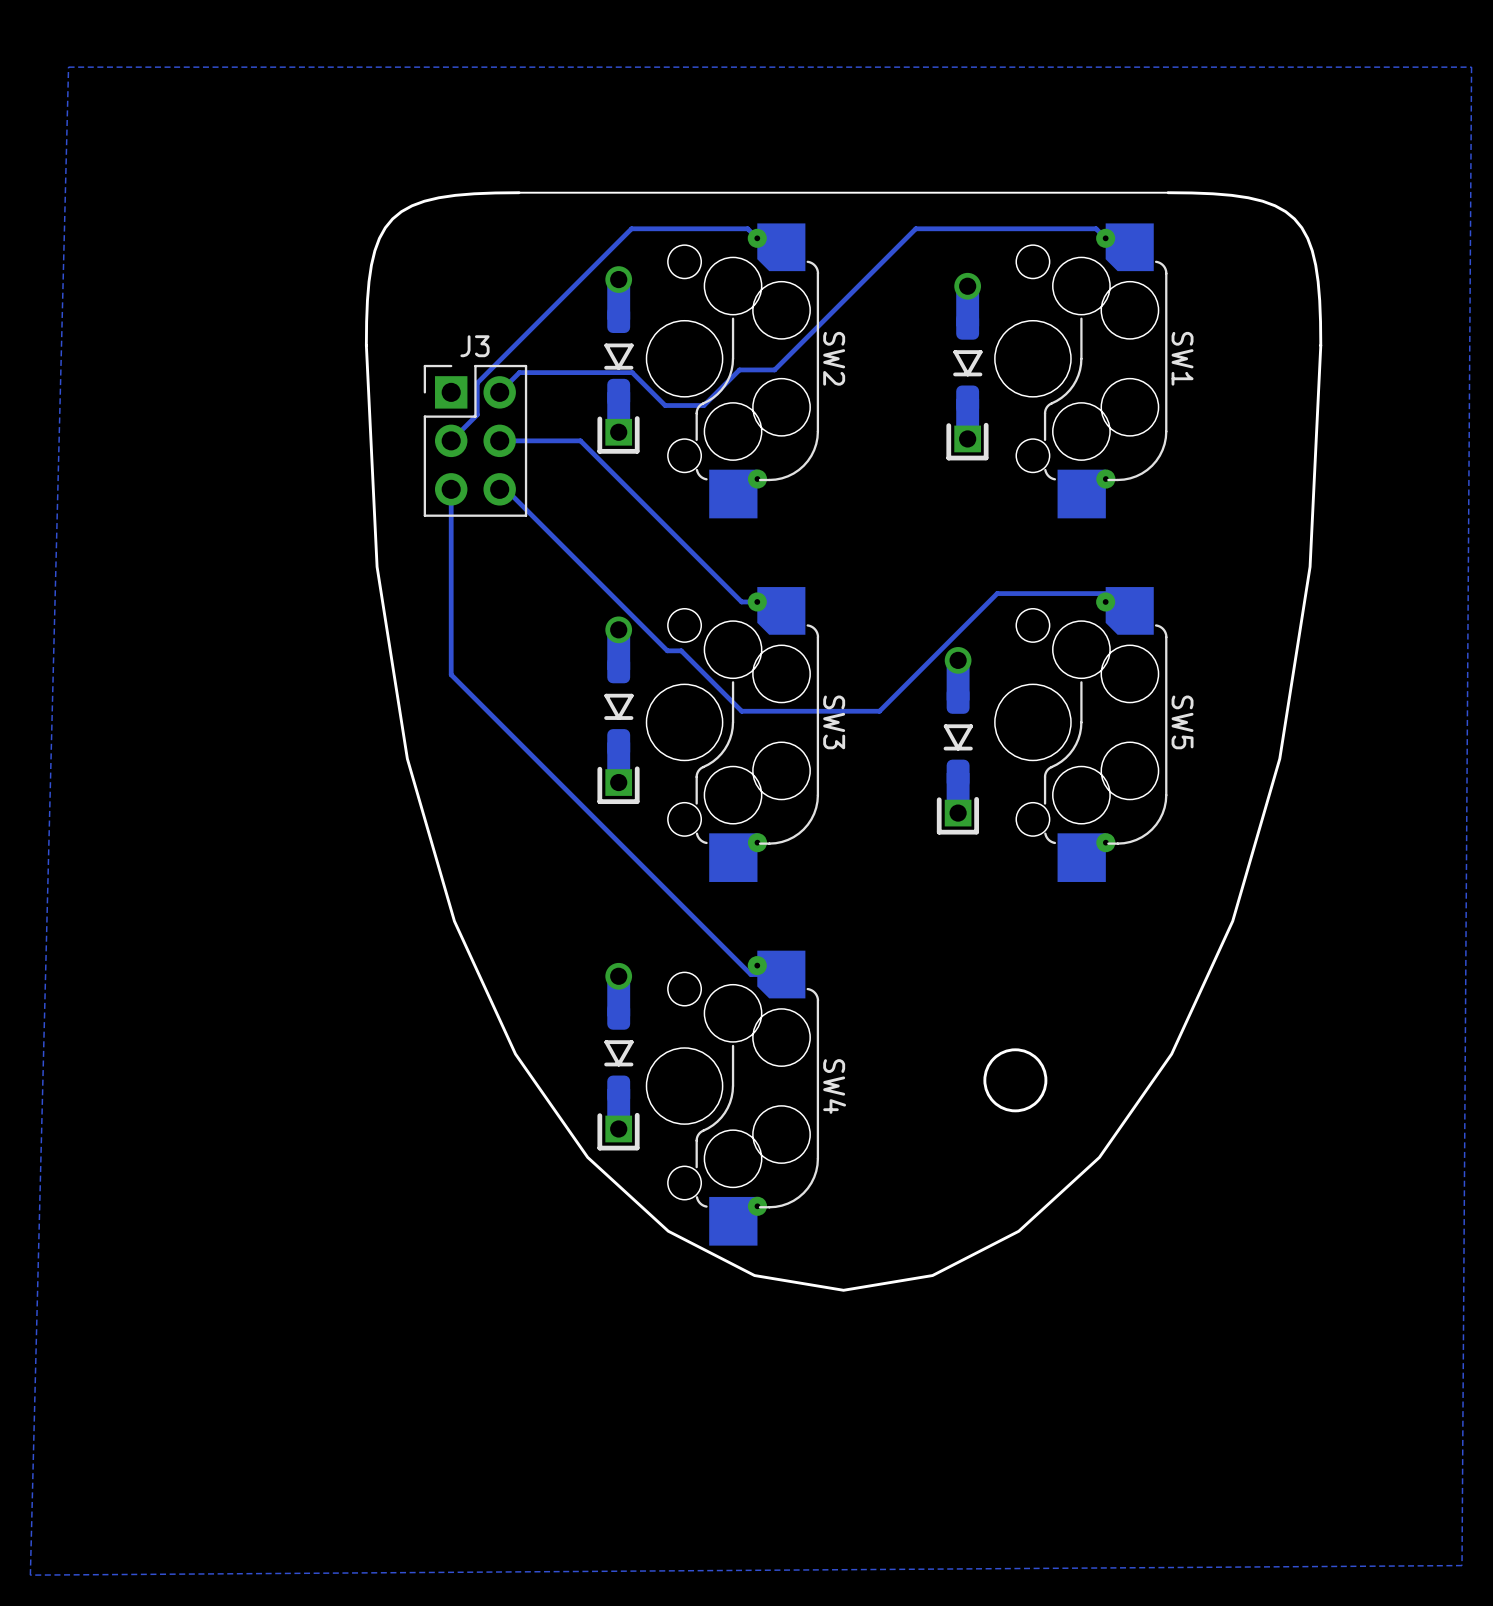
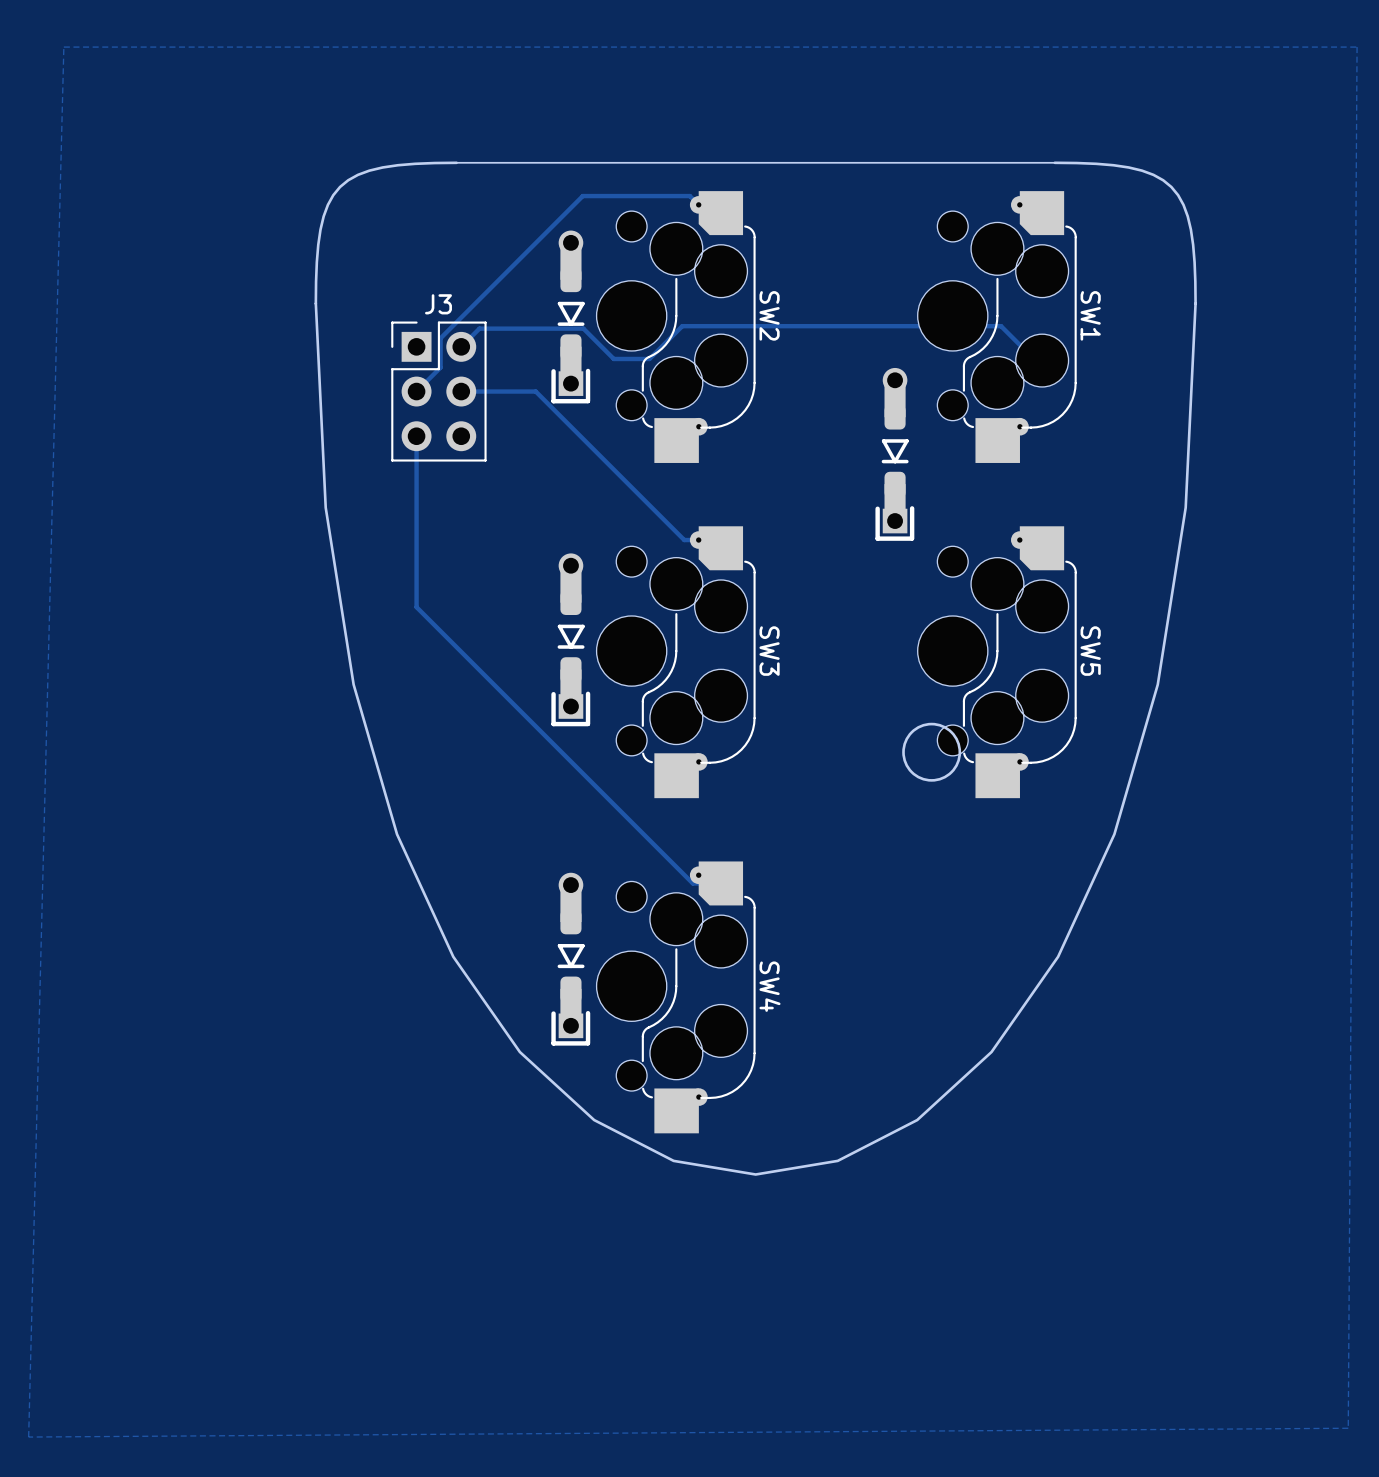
board edge: (1143, 192) (1213, 193) (1262, 201) (1285, 211) (1294, 218) (1301, 227) (1312, 250) (1318, 281) (1320, 345) (1310, 566) (1279, 758) (1232, 921) (1171, 1054) (1099, 1157) (1018, 1231) (932, 1275) (843, 1290) (754, 1275) (668, 1231) (587, 1157) (515, 1054) (454, 921) (407, 758) (377, 566) (366, 345) (369, 281) (374, 250) (379, 238) (392, 218) (401, 211) (412, 205) (438, 197) (474, 193) (519, 192) -> (1054, 162) (1096, 163) (1128, 167) (1153, 174) (1163, 180) (1171, 187) (1183, 204) (1193, 244) (1195, 303) (1185, 507) (1157, 684) (1114, 834) (1058, 956) (991, 1052) (917, 1120) (837, 1160) (755, 1174) (673, 1160) (594, 1120) (519, 1052) (453, 956) (397, 834) (353, 684) (325, 507) (315, 303) (318, 244) (323, 216) (333, 195) (340, 187) (348, 180) (369, 170) (415, 163) (479, 162)
track: (1105, 238) (1096, 228) (915, 228) (774, 369) -> (1033, 358) (1001, 326) (714, 326)
part: (967, 366) -> none
track: (499, 489) (505, 489) (667, 650) (681, 650) (741, 711) (879, 711) (997, 593) (1112, 593) (1129, 610) -> none
part: none -> (894, 454)
part: (957, 740) -> none
round board edge position: (1015, 1080) -> (931, 752)

